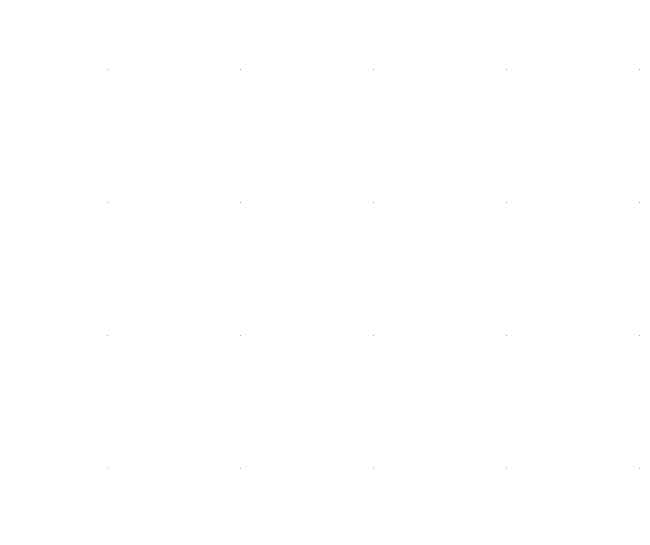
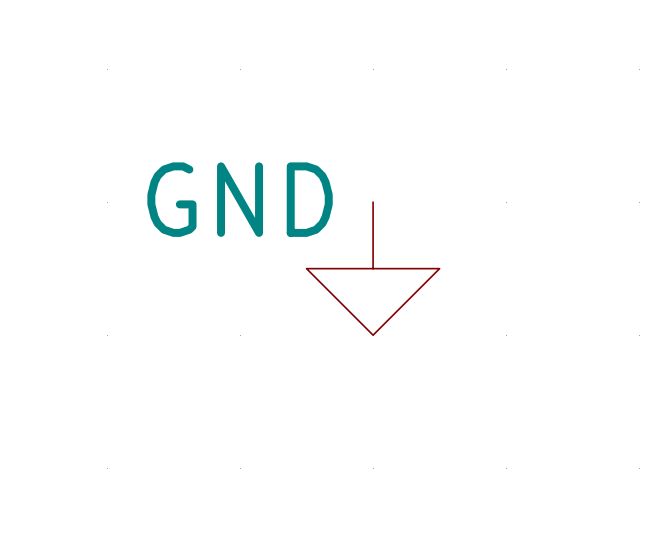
power symbol: none -> GND (373, 268)

